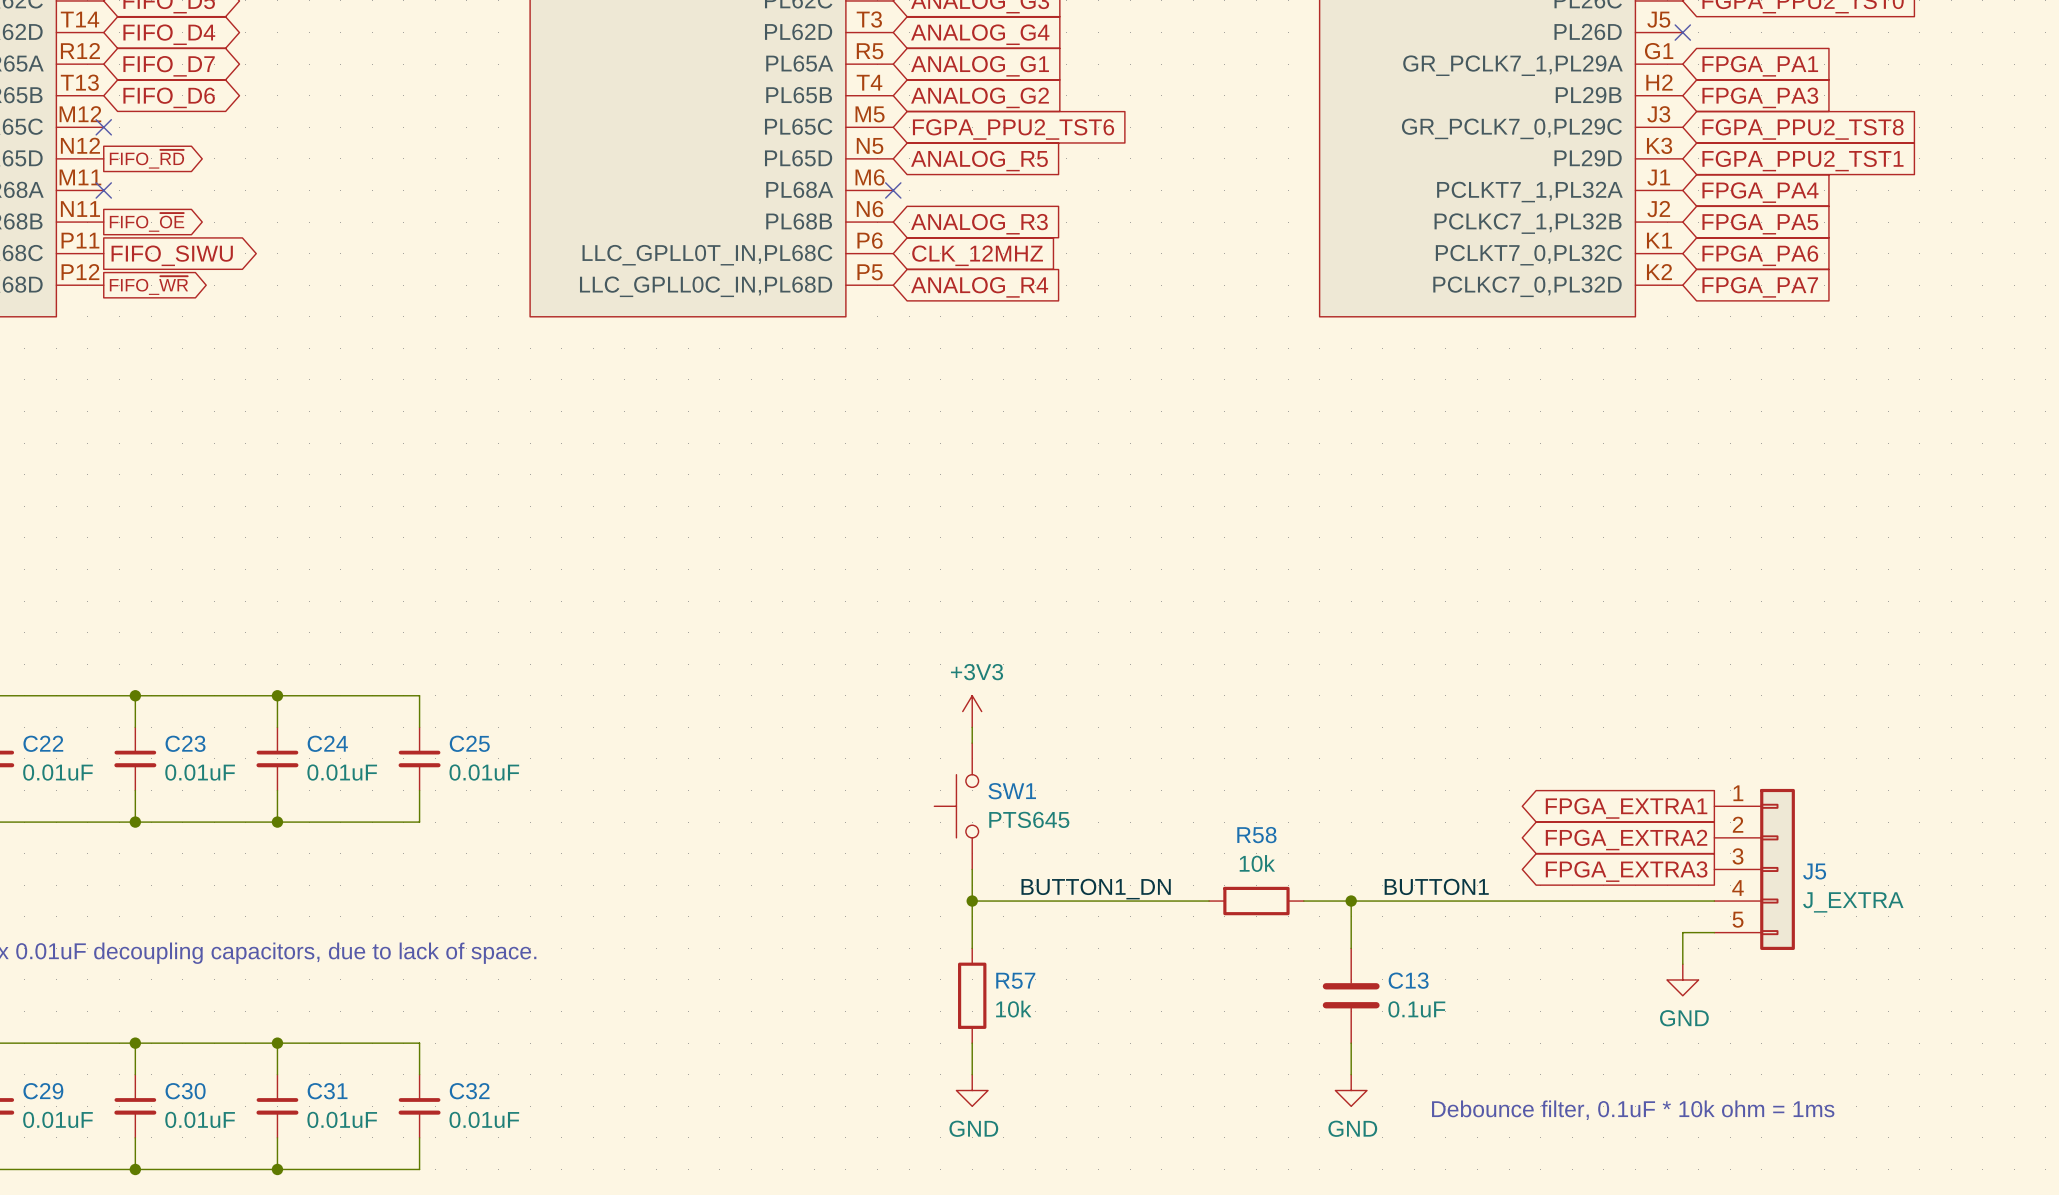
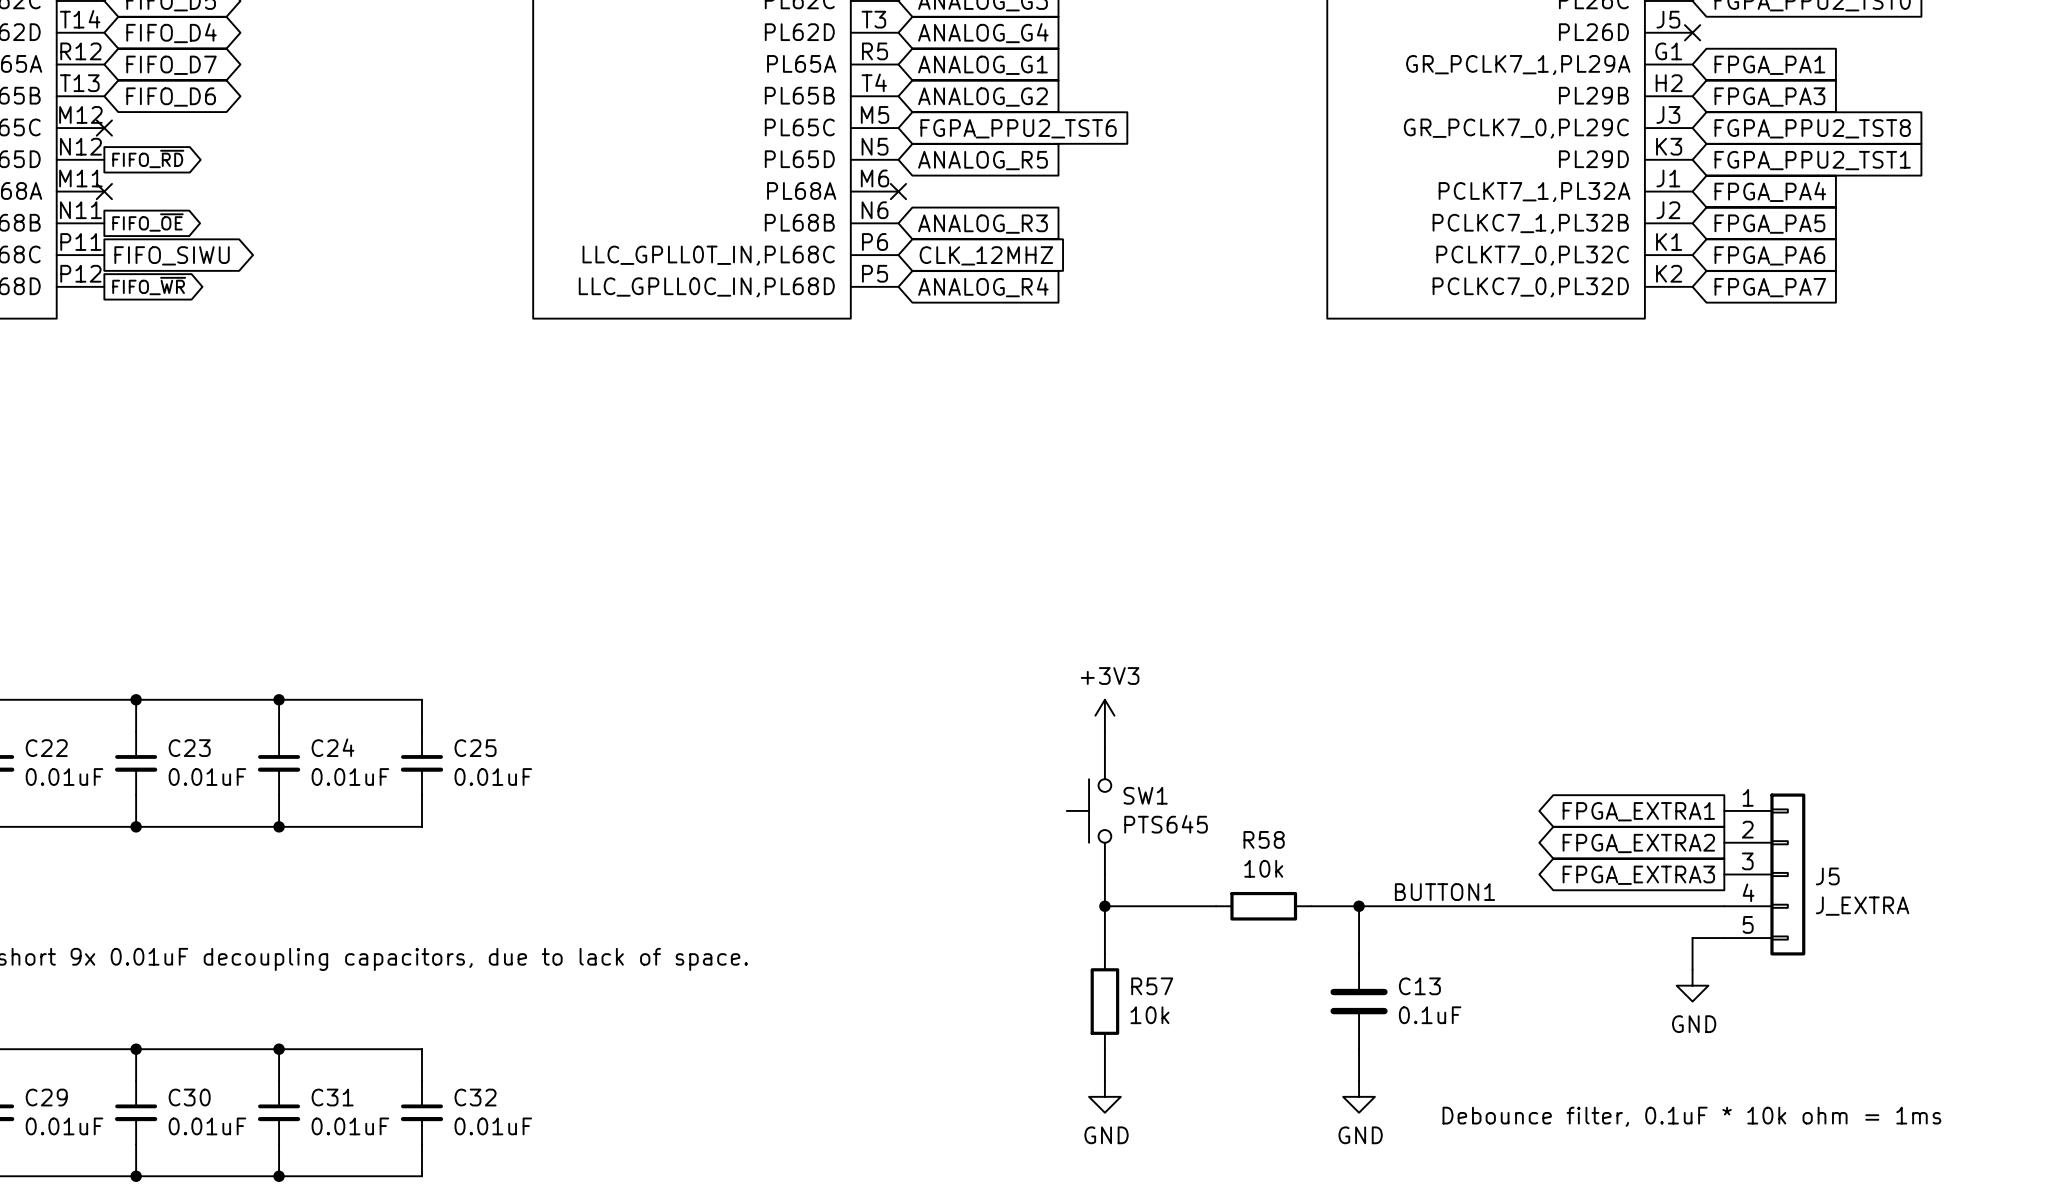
power symbol position: +3V3 (972, 711) -> +3V3 (1104, 715)
wire: (972, 727) (972, 743) -> (1104, 731) (1104, 747)
SW1 position: (956, 806) -> (1089, 810)
wire: (972, 869) (972, 948) -> (1104, 874) (1104, 953)
label: BUTTON1_DN (1096, 889) -> none
wire: (972, 901) (1098, 901) -> none
junction: (972, 901) -> none
junction: none -> (1104, 906)
R57 position: (972, 995) -> (1104, 1001)
wire: (972, 1043) (972, 1074) -> (1104, 1049) (1104, 1080)
power symbol position: GND (972, 1090) -> GND (1104, 1096)

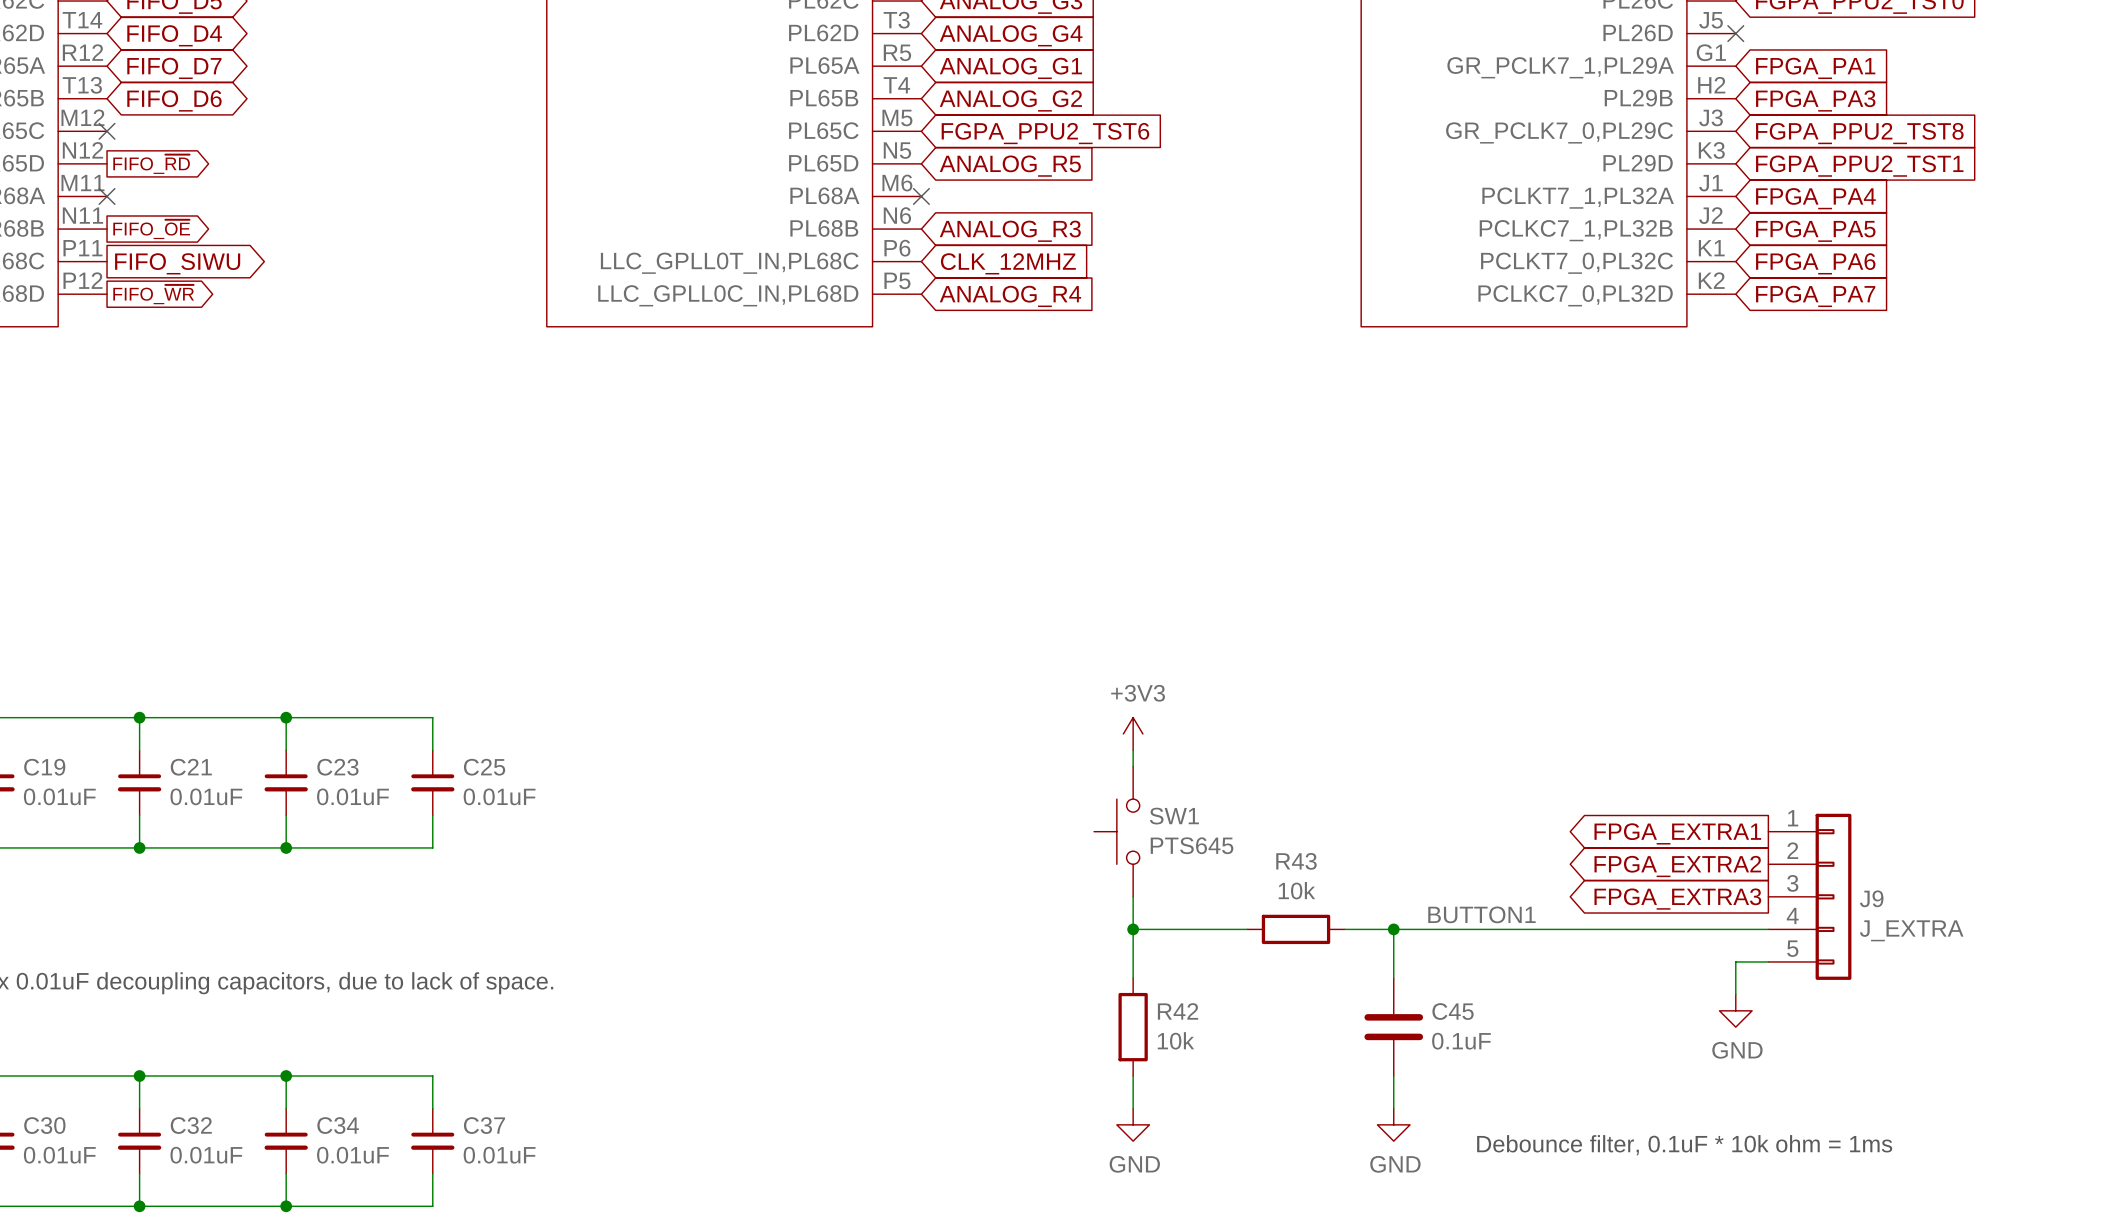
C24 name: C24 (332, 747) -> C23 (337, 767)
C22 name: C22 (46, 748) -> C19 (44, 767)
C23 name: C23 (189, 748) -> C21 (191, 767)
R58 name: R58 (1264, 839) -> R43 (1296, 861)
J5 name: J5 (1827, 876) -> J9 (1871, 898)
R57 name: R57 (1152, 986) -> R42 (1178, 1011)
C13 name: C13 (1419, 986) -> C45 (1453, 1011)
C29 name: C29 (46, 1097) -> C30 (44, 1125)
C30 name: C30 (189, 1097) -> C32 (191, 1125)
C31 name: C31 (332, 1097) -> C34 (338, 1125)
C32 name: C32 (475, 1097) -> C37 (484, 1125)

